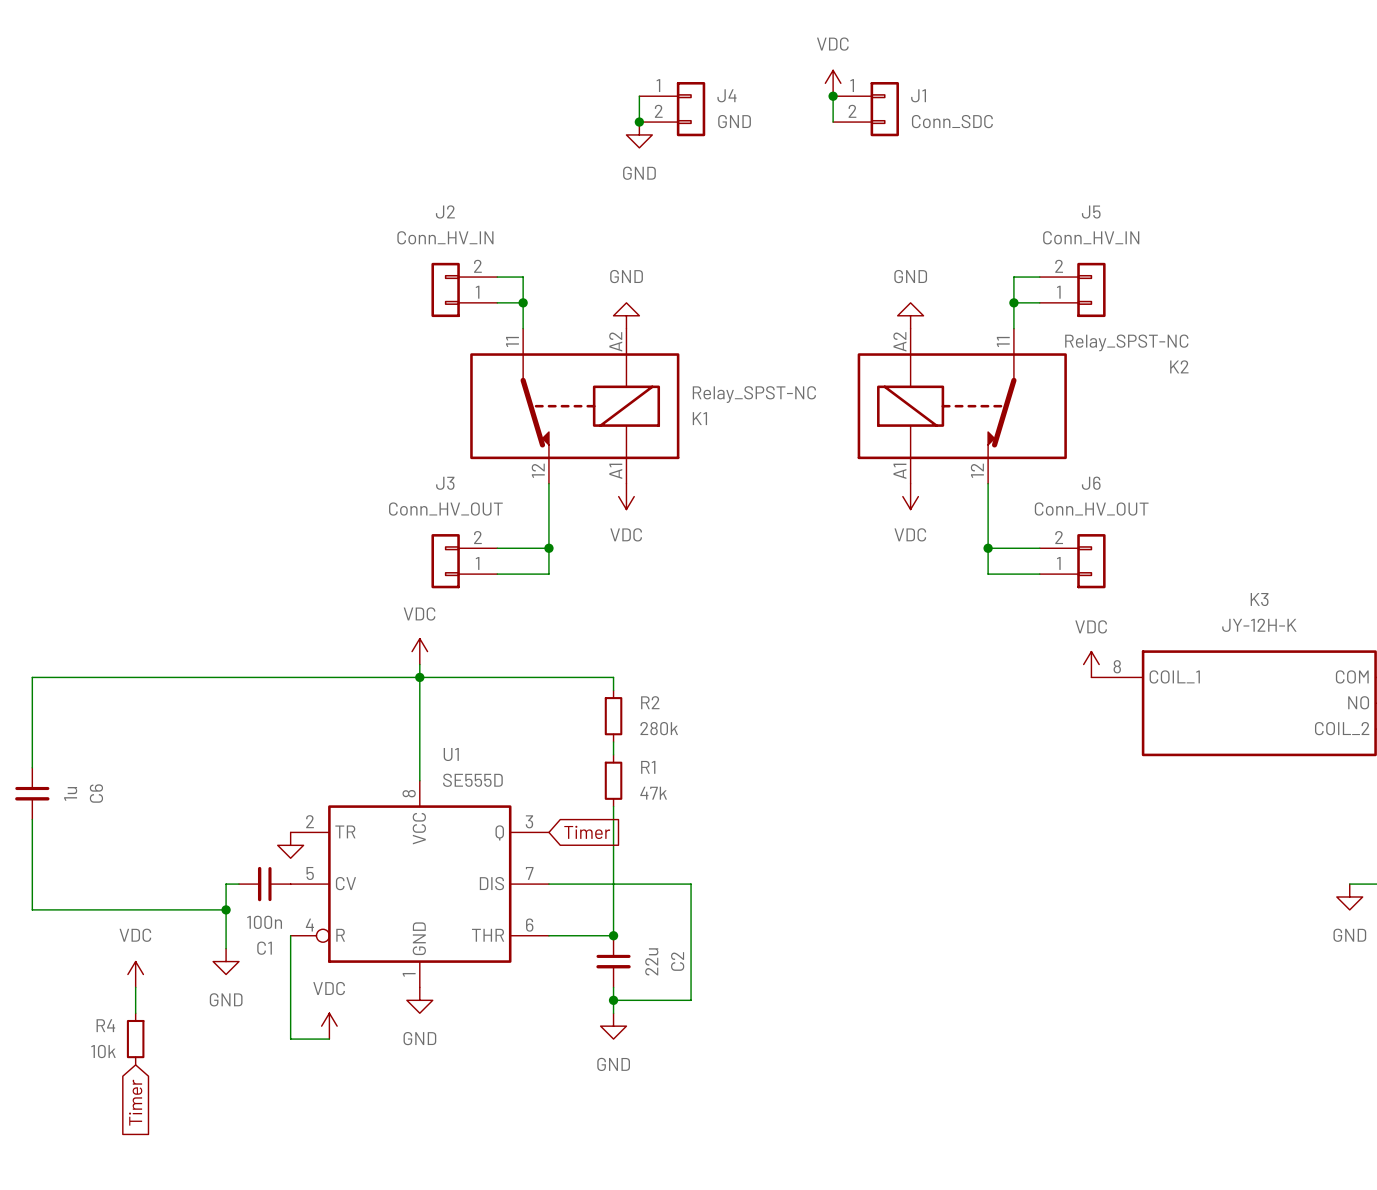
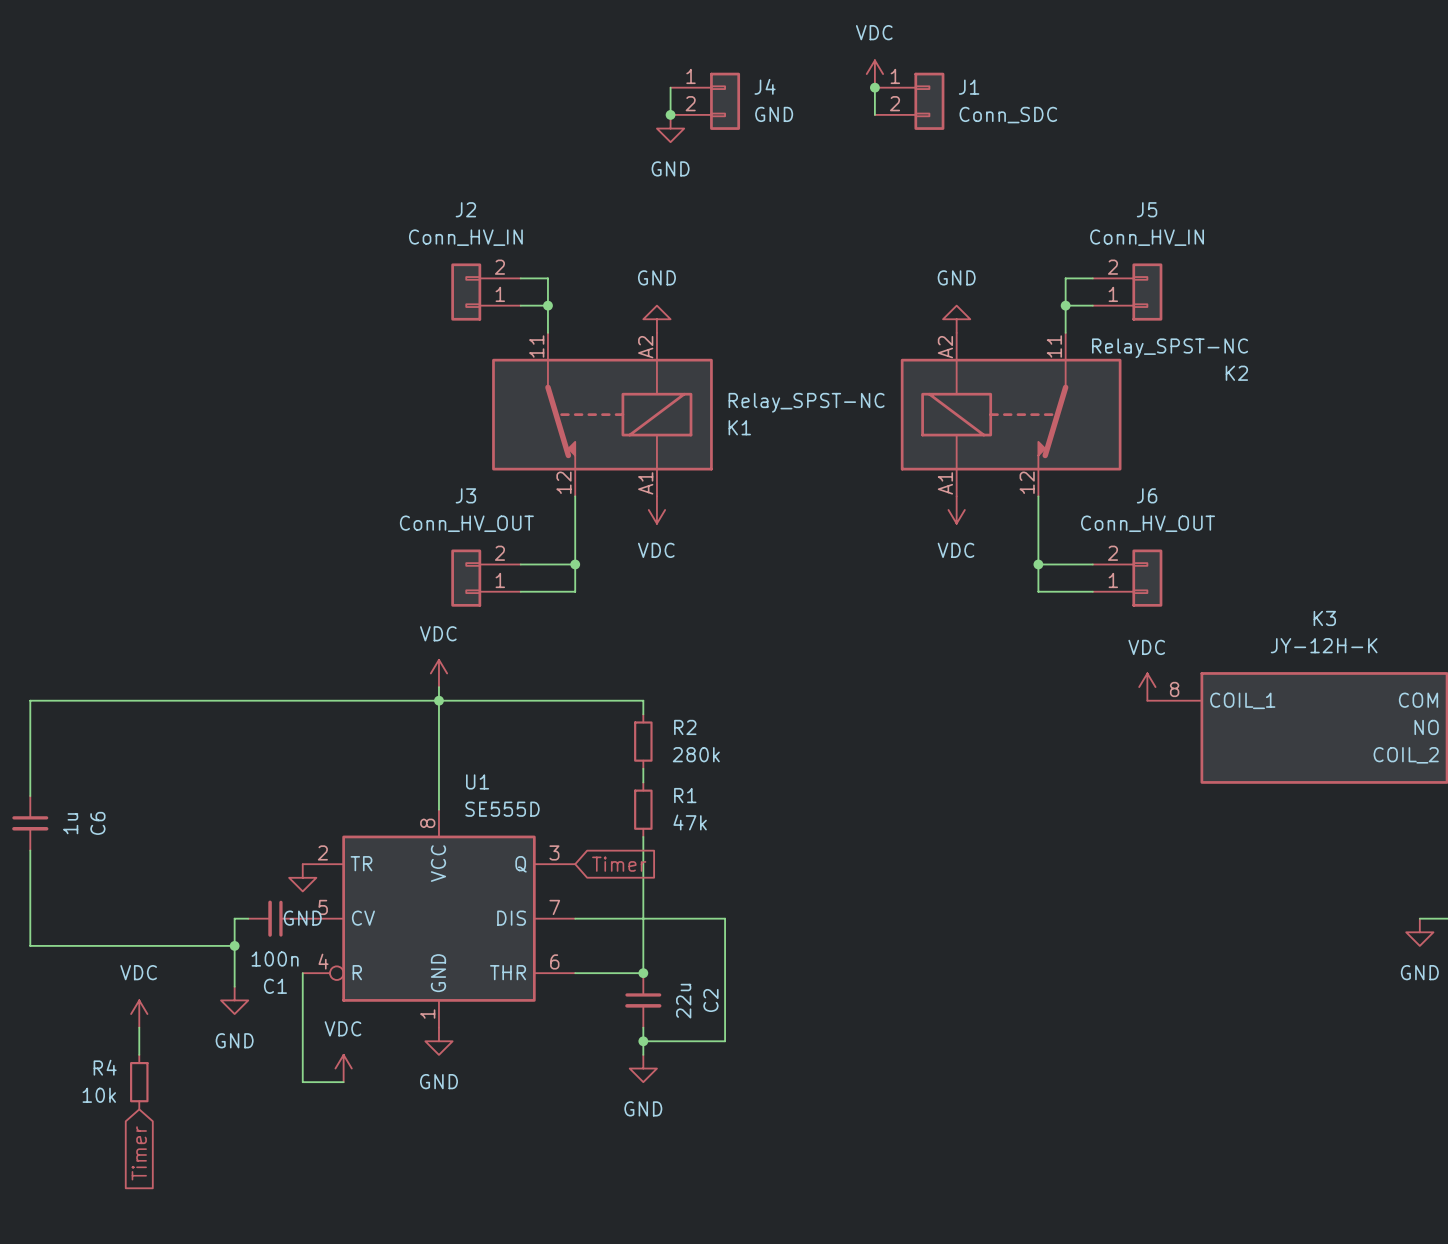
power symbol text: none -> GND (302, 918)

